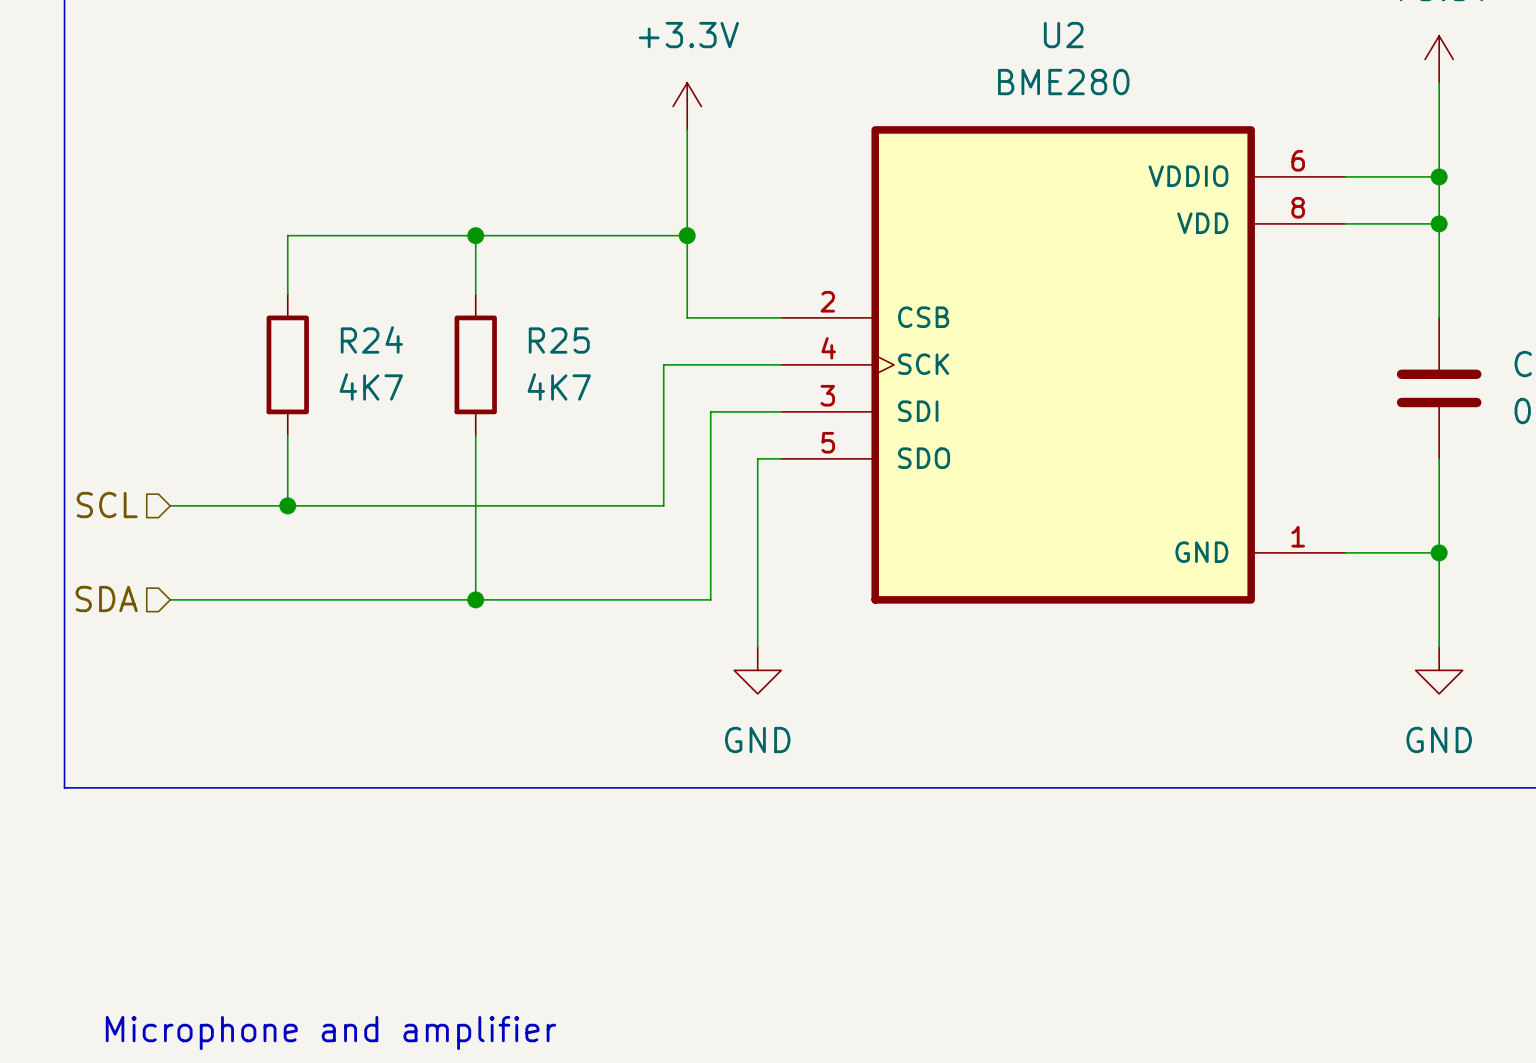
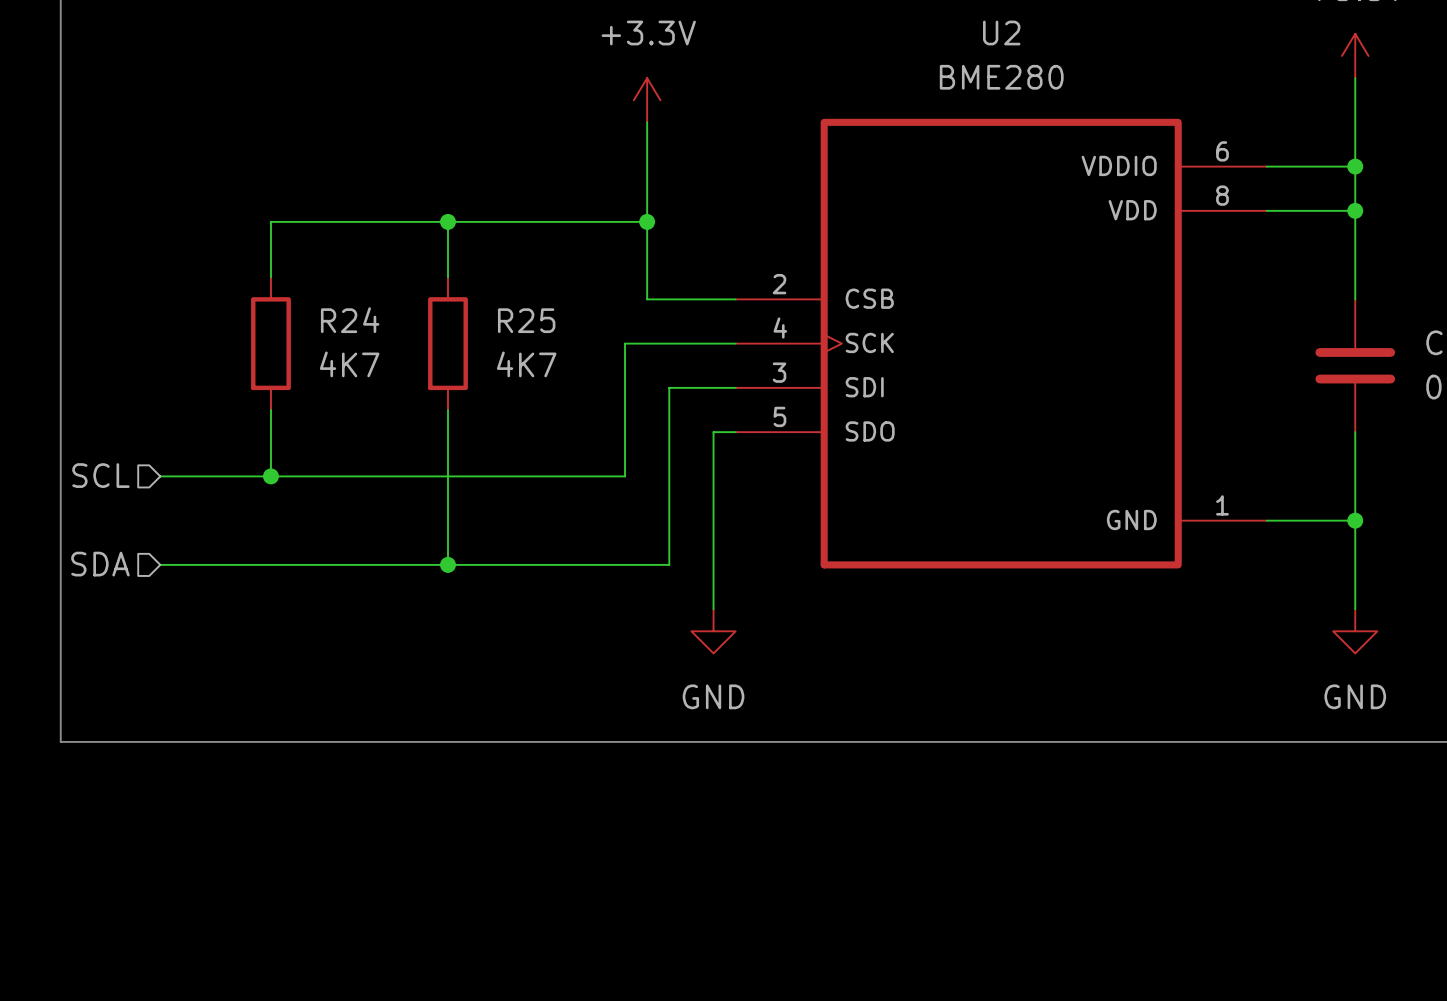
text: Microphone and amplifier (331, 1033) -> none

